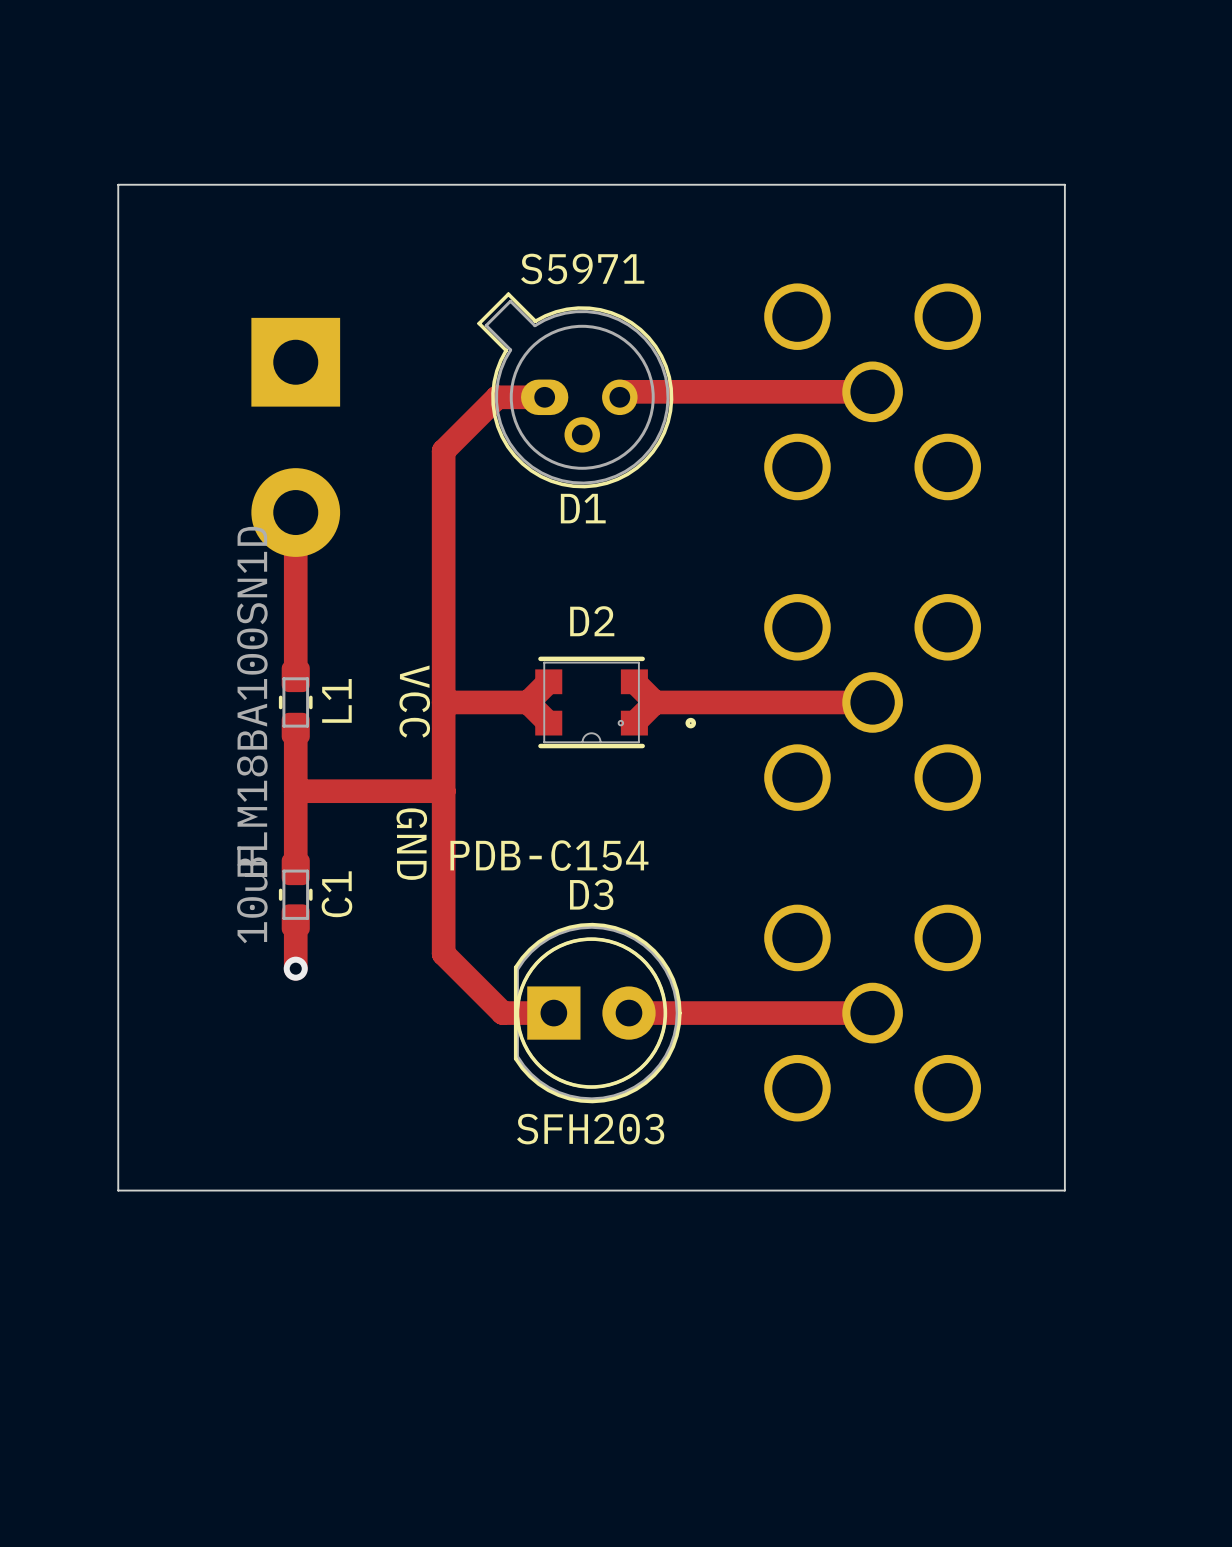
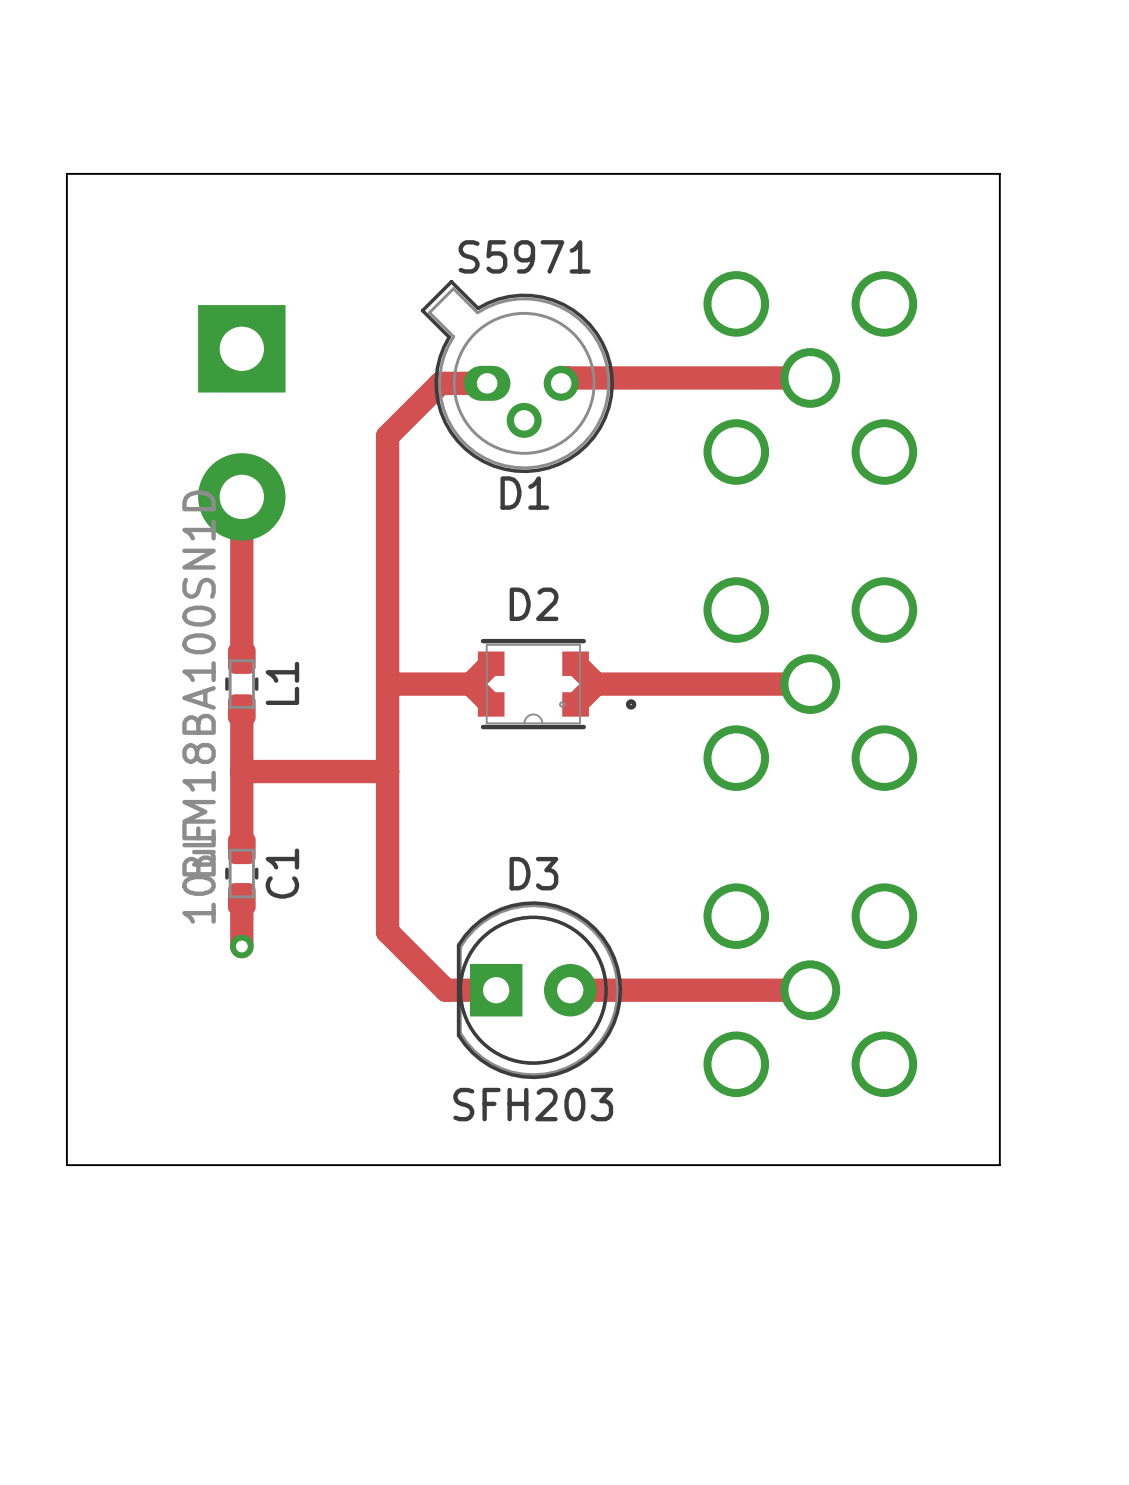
text: VCC (414, 701) -> none
text: GND (411, 844) -> none
text: PDB-C154 (549, 855) -> none

